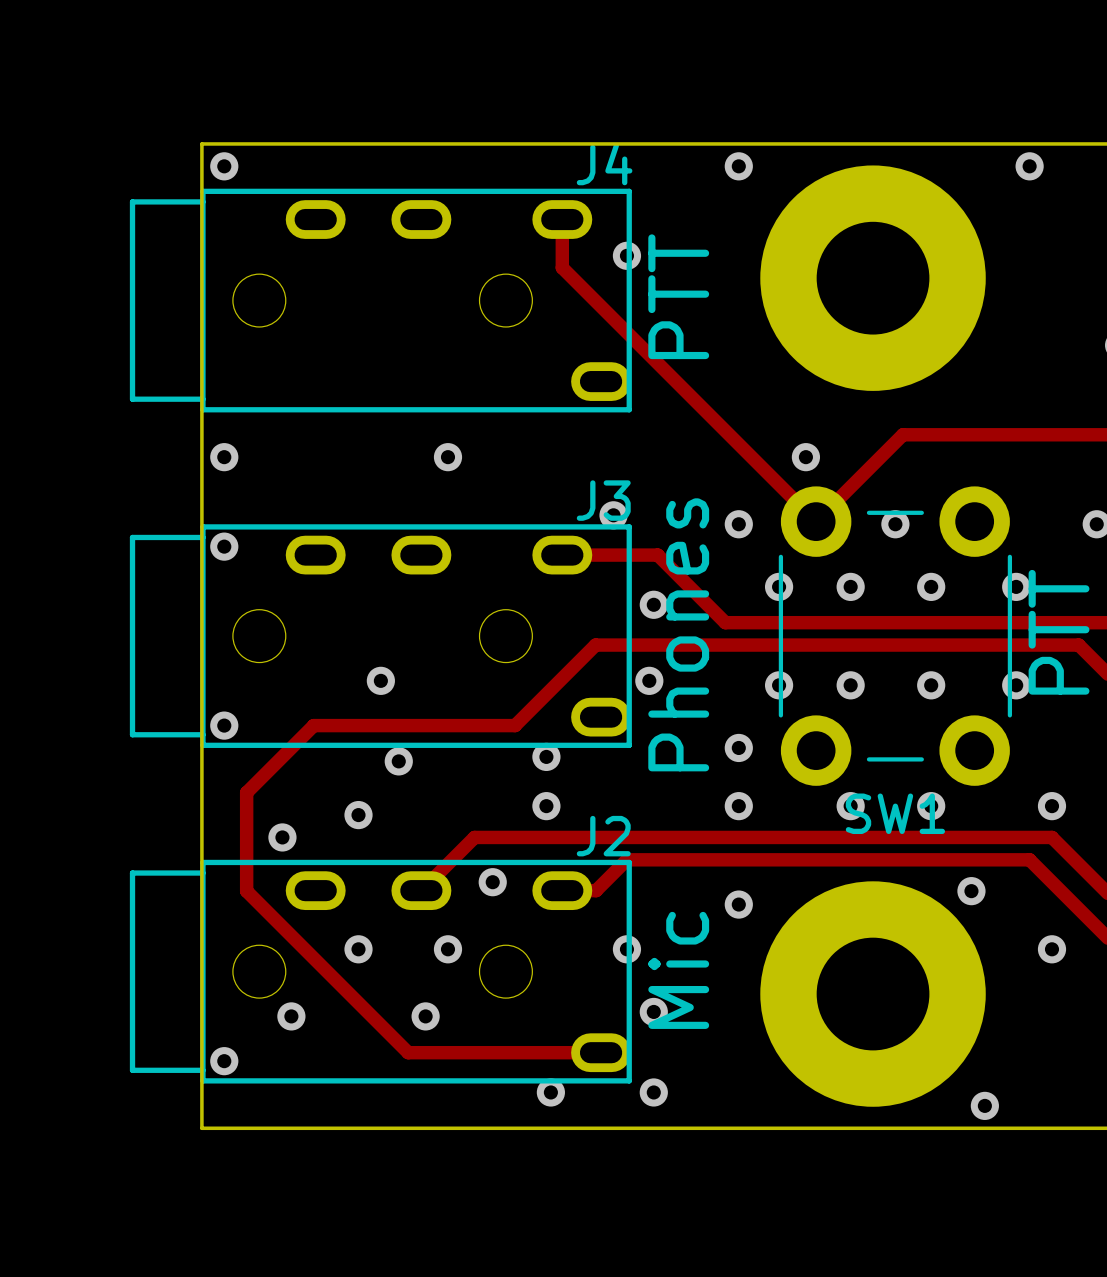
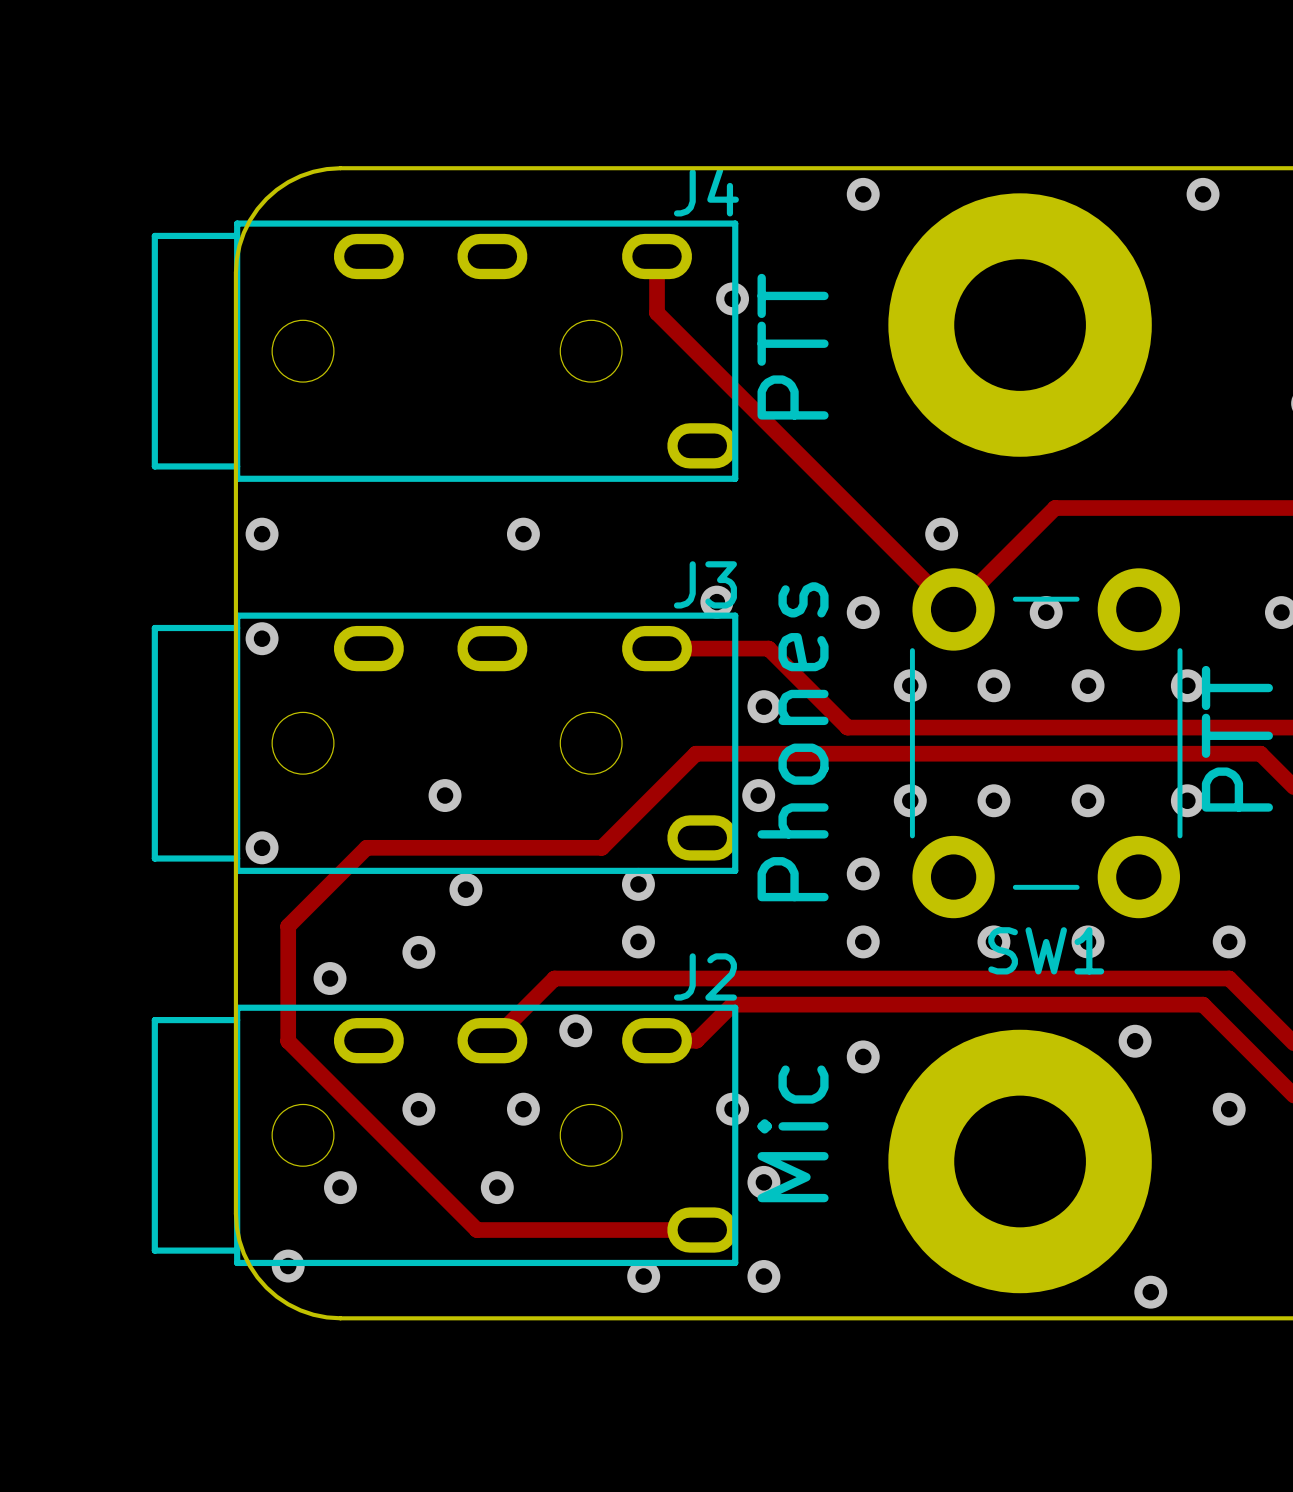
board edge: (291, 143) (201, 143) (201, 233) -> (340, 168) (313, 171) (300, 176) (276, 189) (266, 198) (257, 209) (243, 232) (236, 259) (235, 272)
via: (224, 166) -> none
board edge: (201, 1038) (201, 1128) (291, 1128) -> (235, 1213) (236, 1227) (243, 1253) (249, 1266) (266, 1287) (276, 1296) (300, 1310) (313, 1314) (340, 1318)
via position: (224, 1061) -> (288, 1266)

